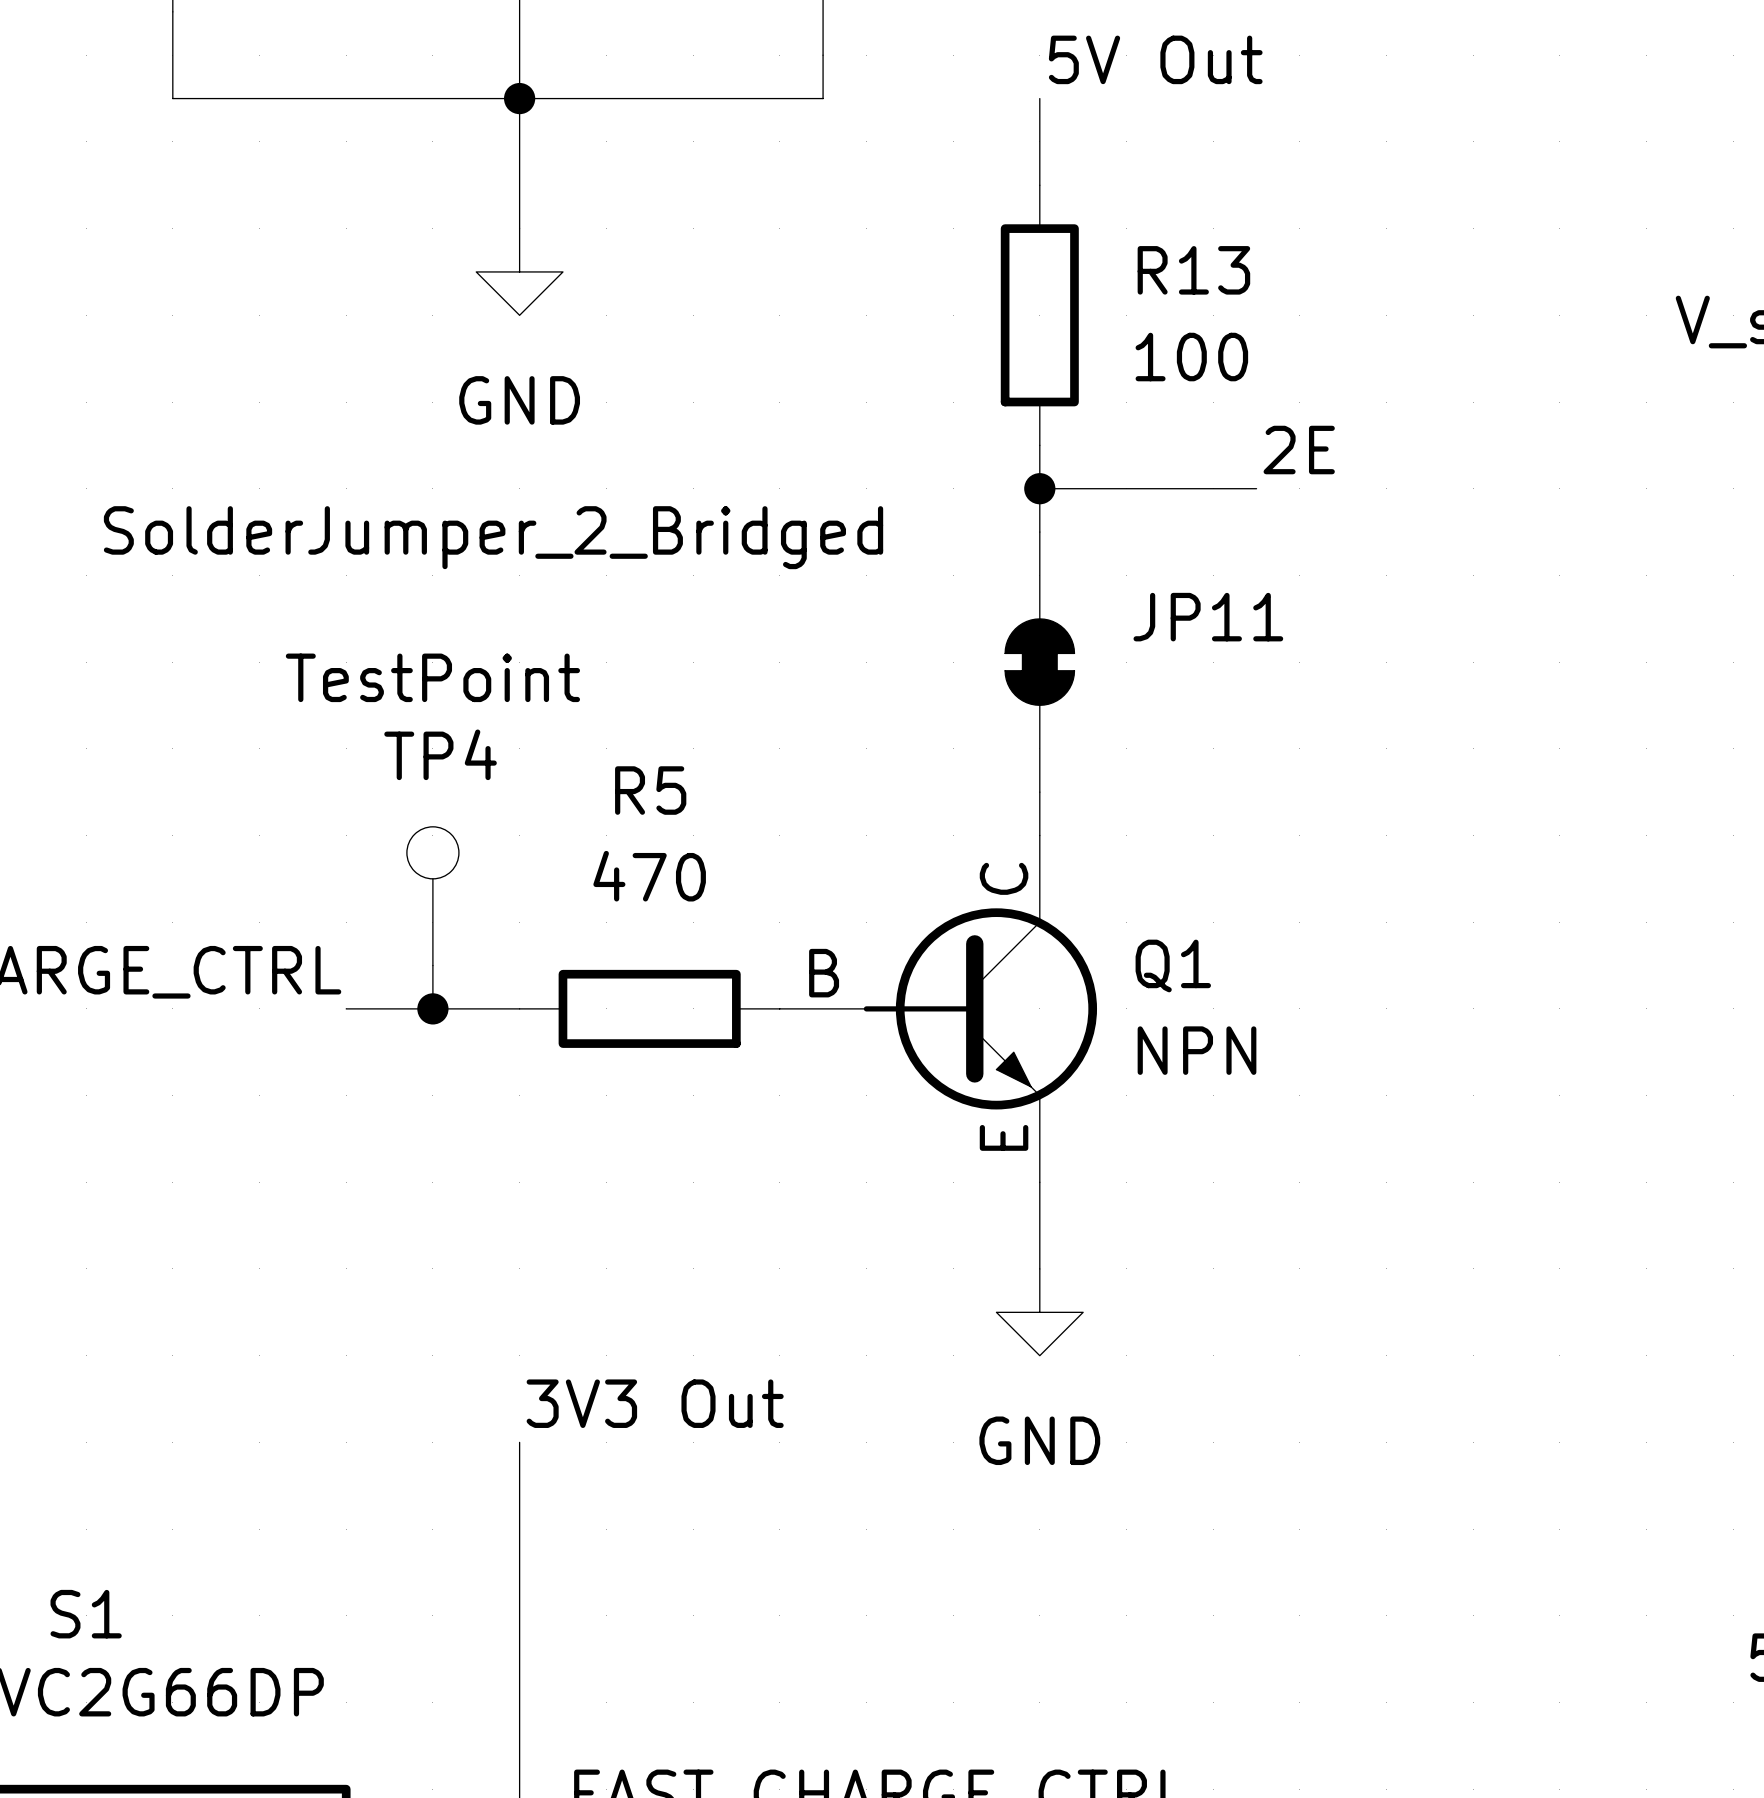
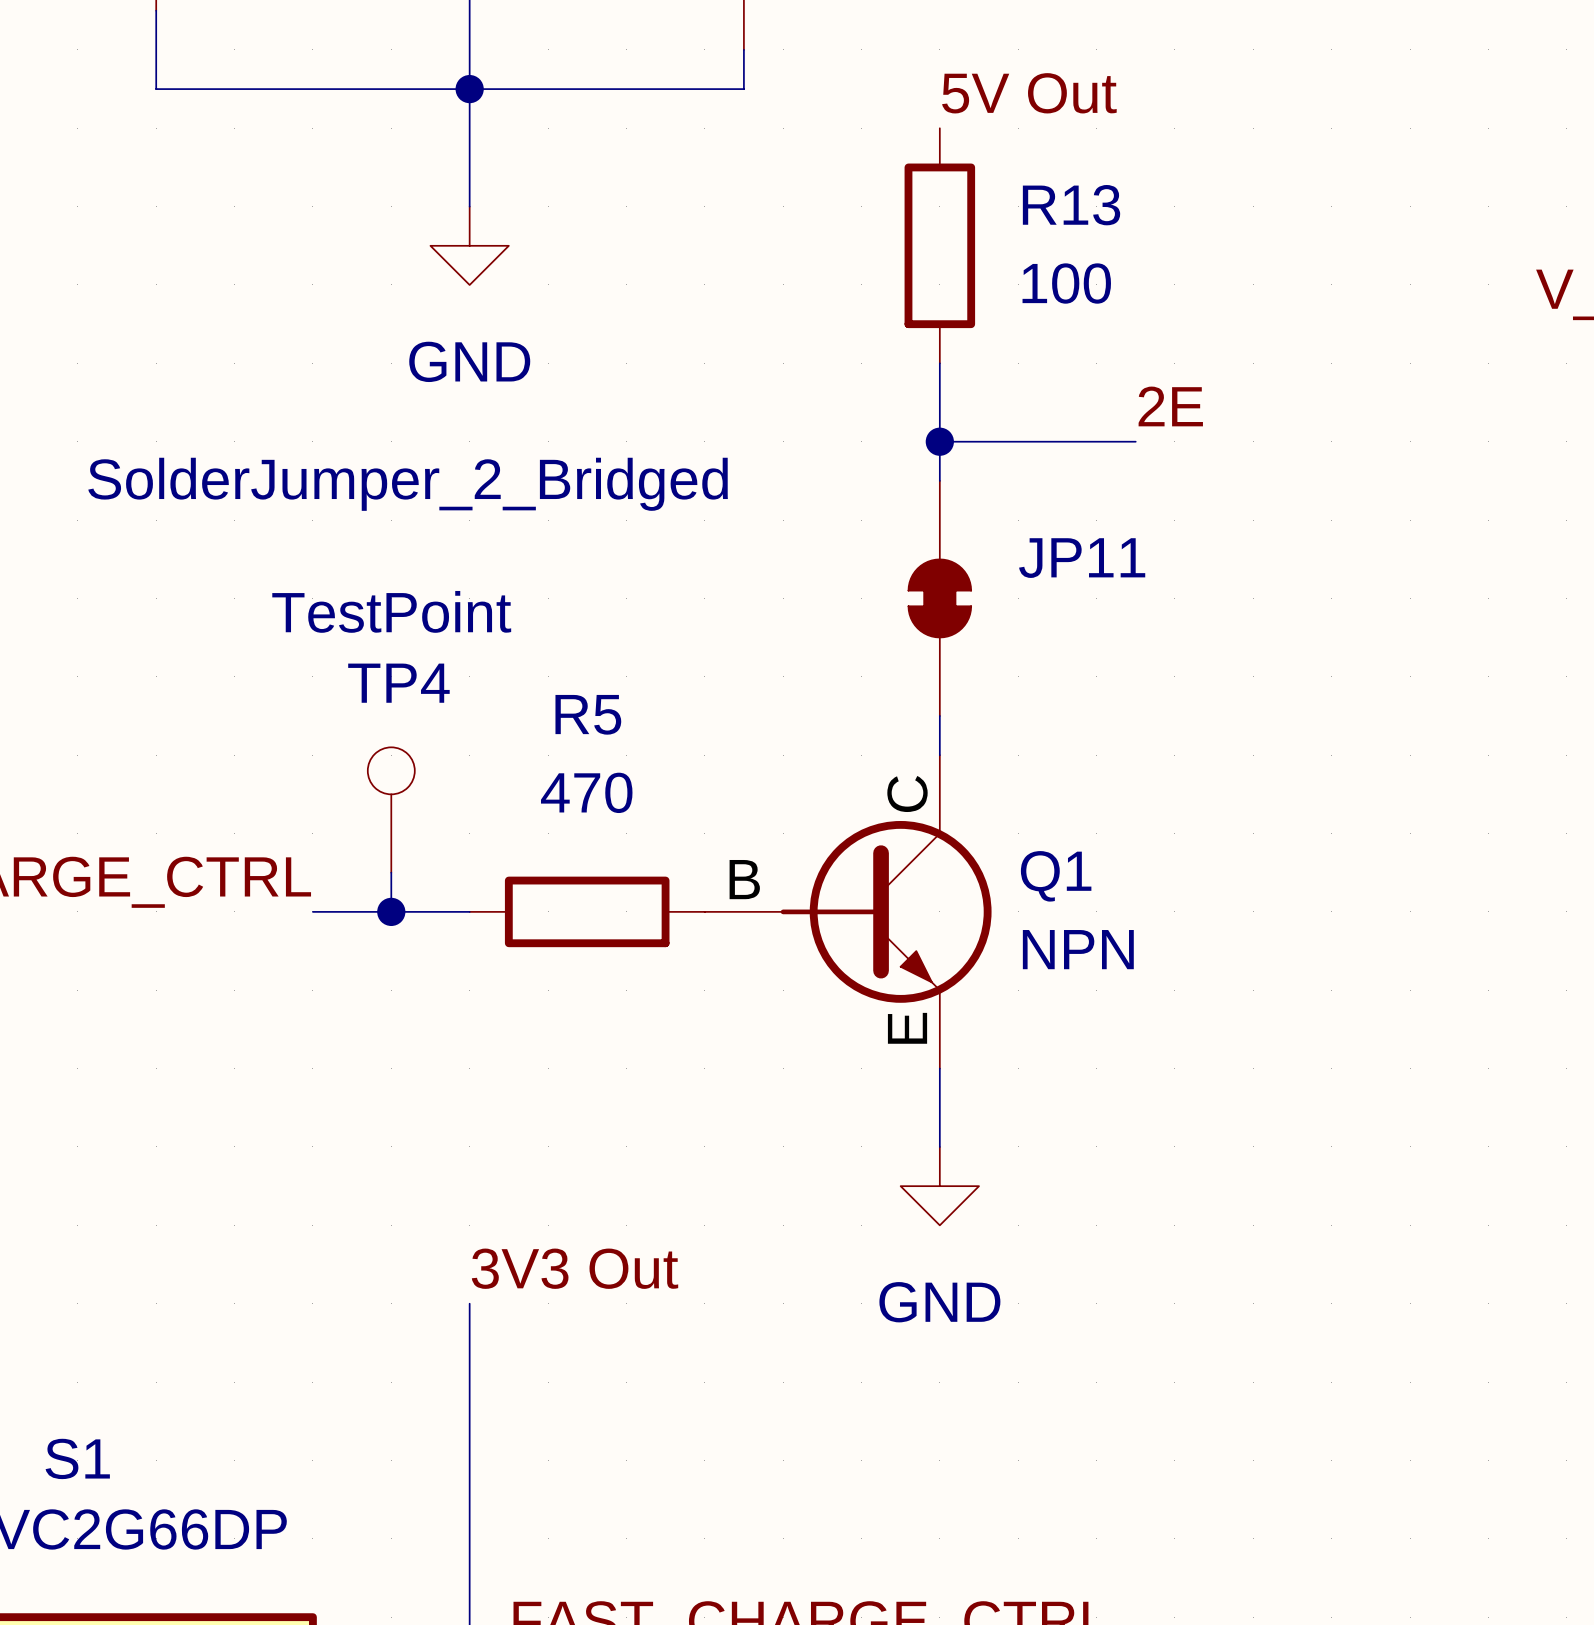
label position: 5V Out (1155, 59) -> 5V Out (1029, 93)
wire: (1039, 98) (1039, 185) -> none
R13 position: (1039, 315) -> (939, 245)

